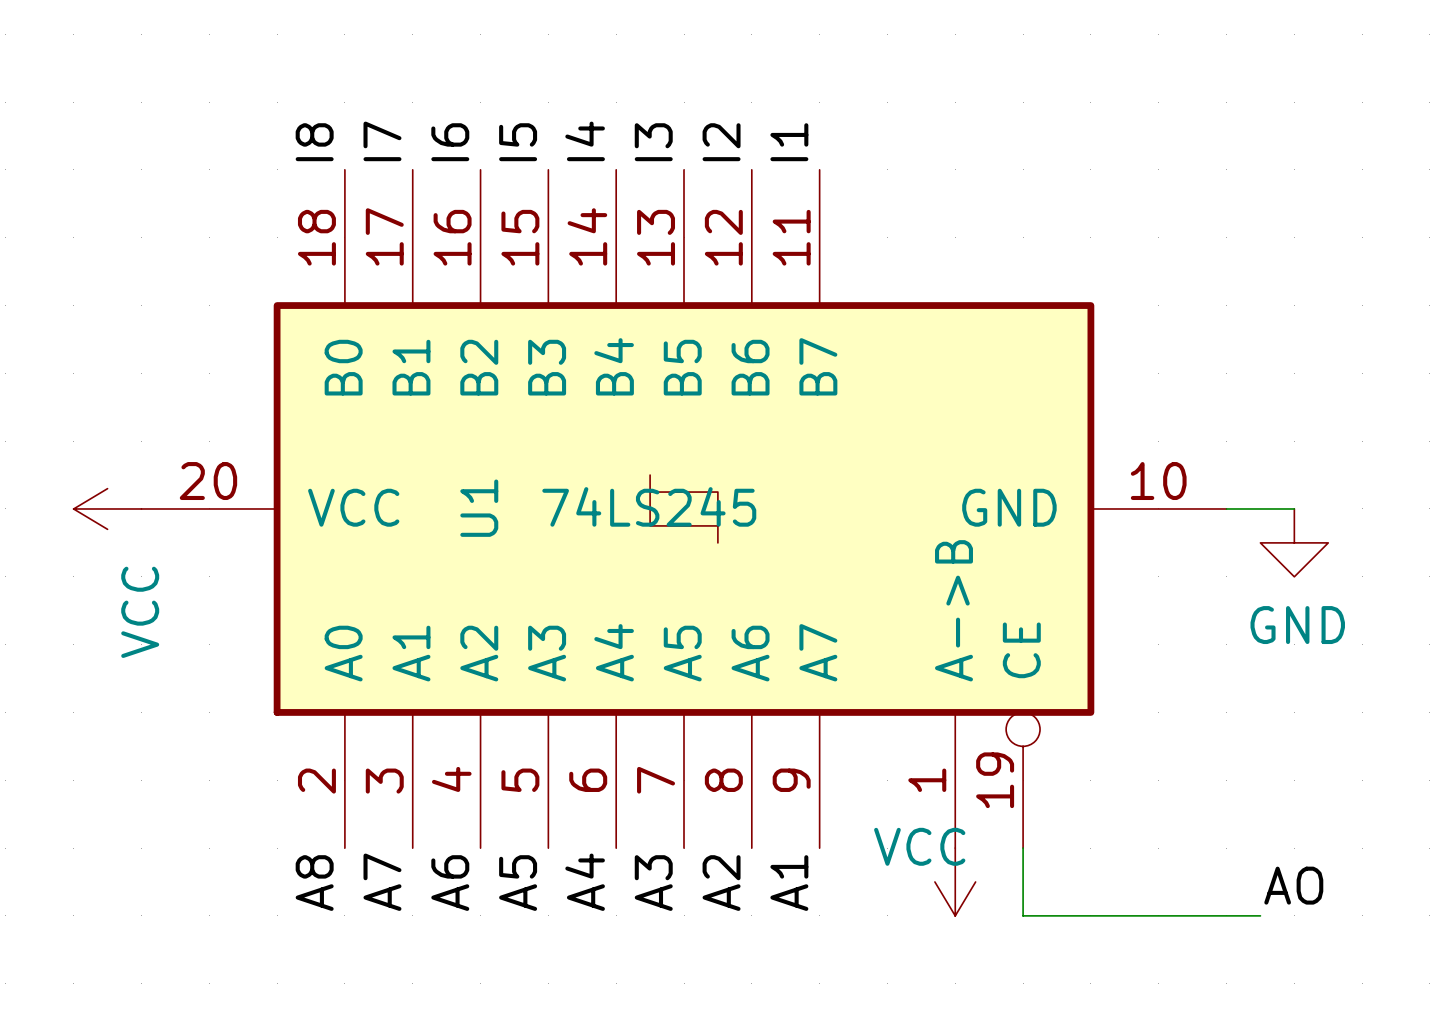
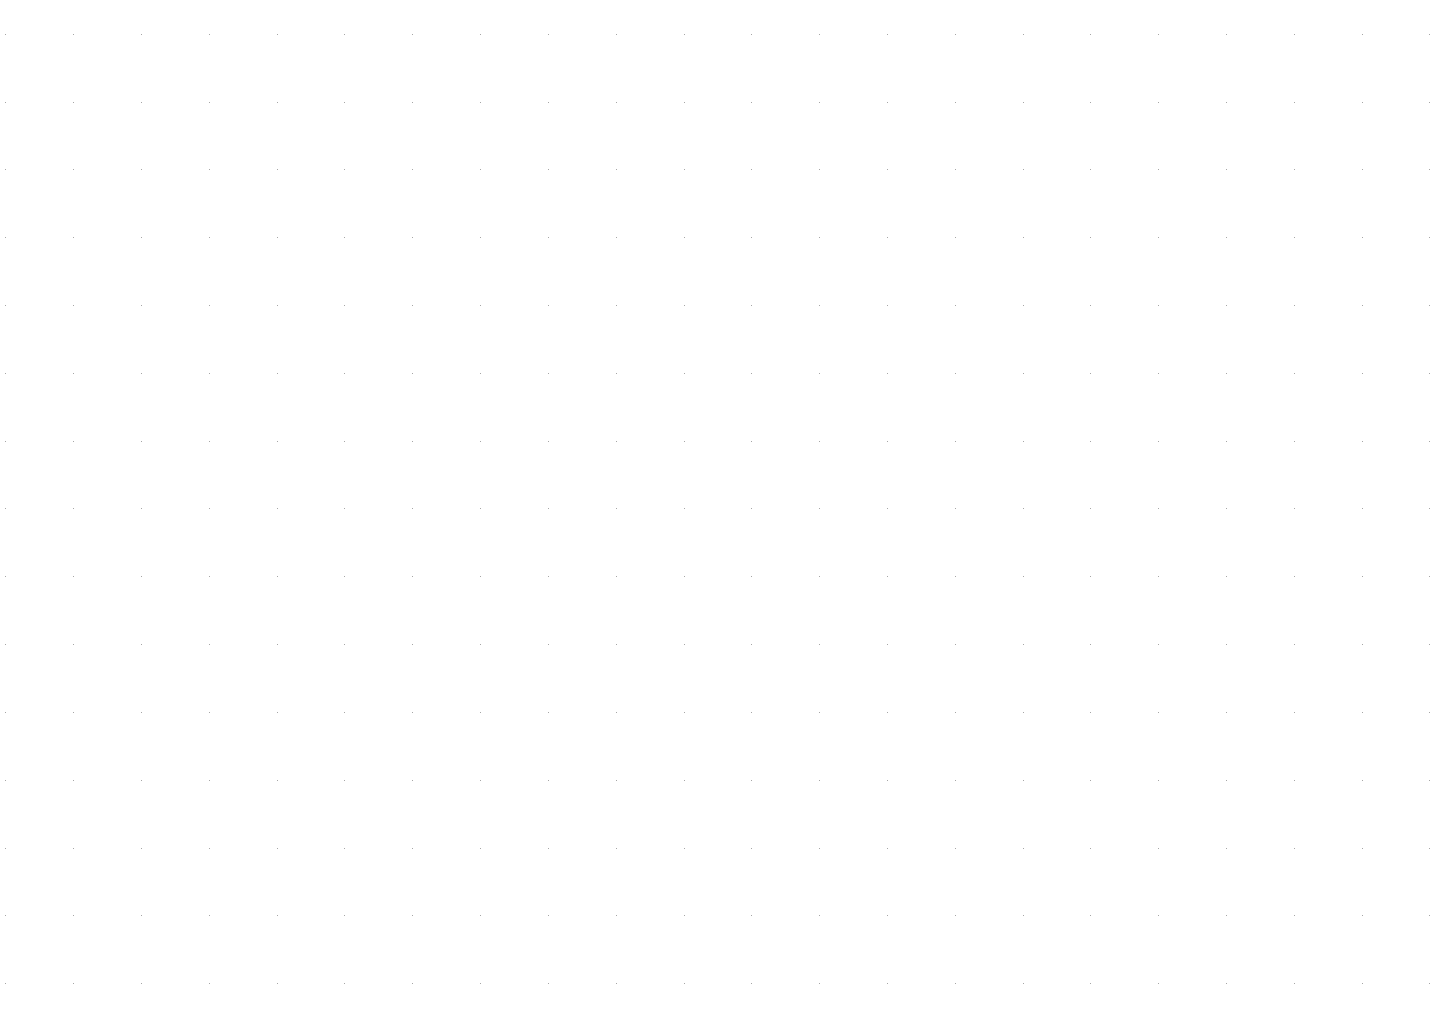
label: I7 (382, 141) -> none
label: I4 (585, 141) -> none
label: I8 (314, 142) -> none
label: I6 (450, 142) -> none
label: I5 (518, 142) -> none
label: I3 (653, 142) -> none
label: I2 (721, 142) -> none
label: I1 (789, 142) -> none
power symbol: VCC (107, 508) -> none
U1: 74LS245 (684, 508) -> none
wire: (1226, 508) (1294, 508) -> none
power symbol: GND (1294, 542) -> none
wire: (1023, 848) (1023, 915) (1260, 915) -> none
power symbol: VCC (955, 881) -> none
label: A7 (382, 882) -> none
label: A4 (585, 882) -> none
label: A8 (314, 883) -> none
label: A6 (450, 883) -> none
label: A5 (518, 883) -> none
label: A3 (653, 883) -> none
label: A2 (721, 883) -> none
label: A1 (789, 883) -> none
label: AO (1293, 885) -> none

